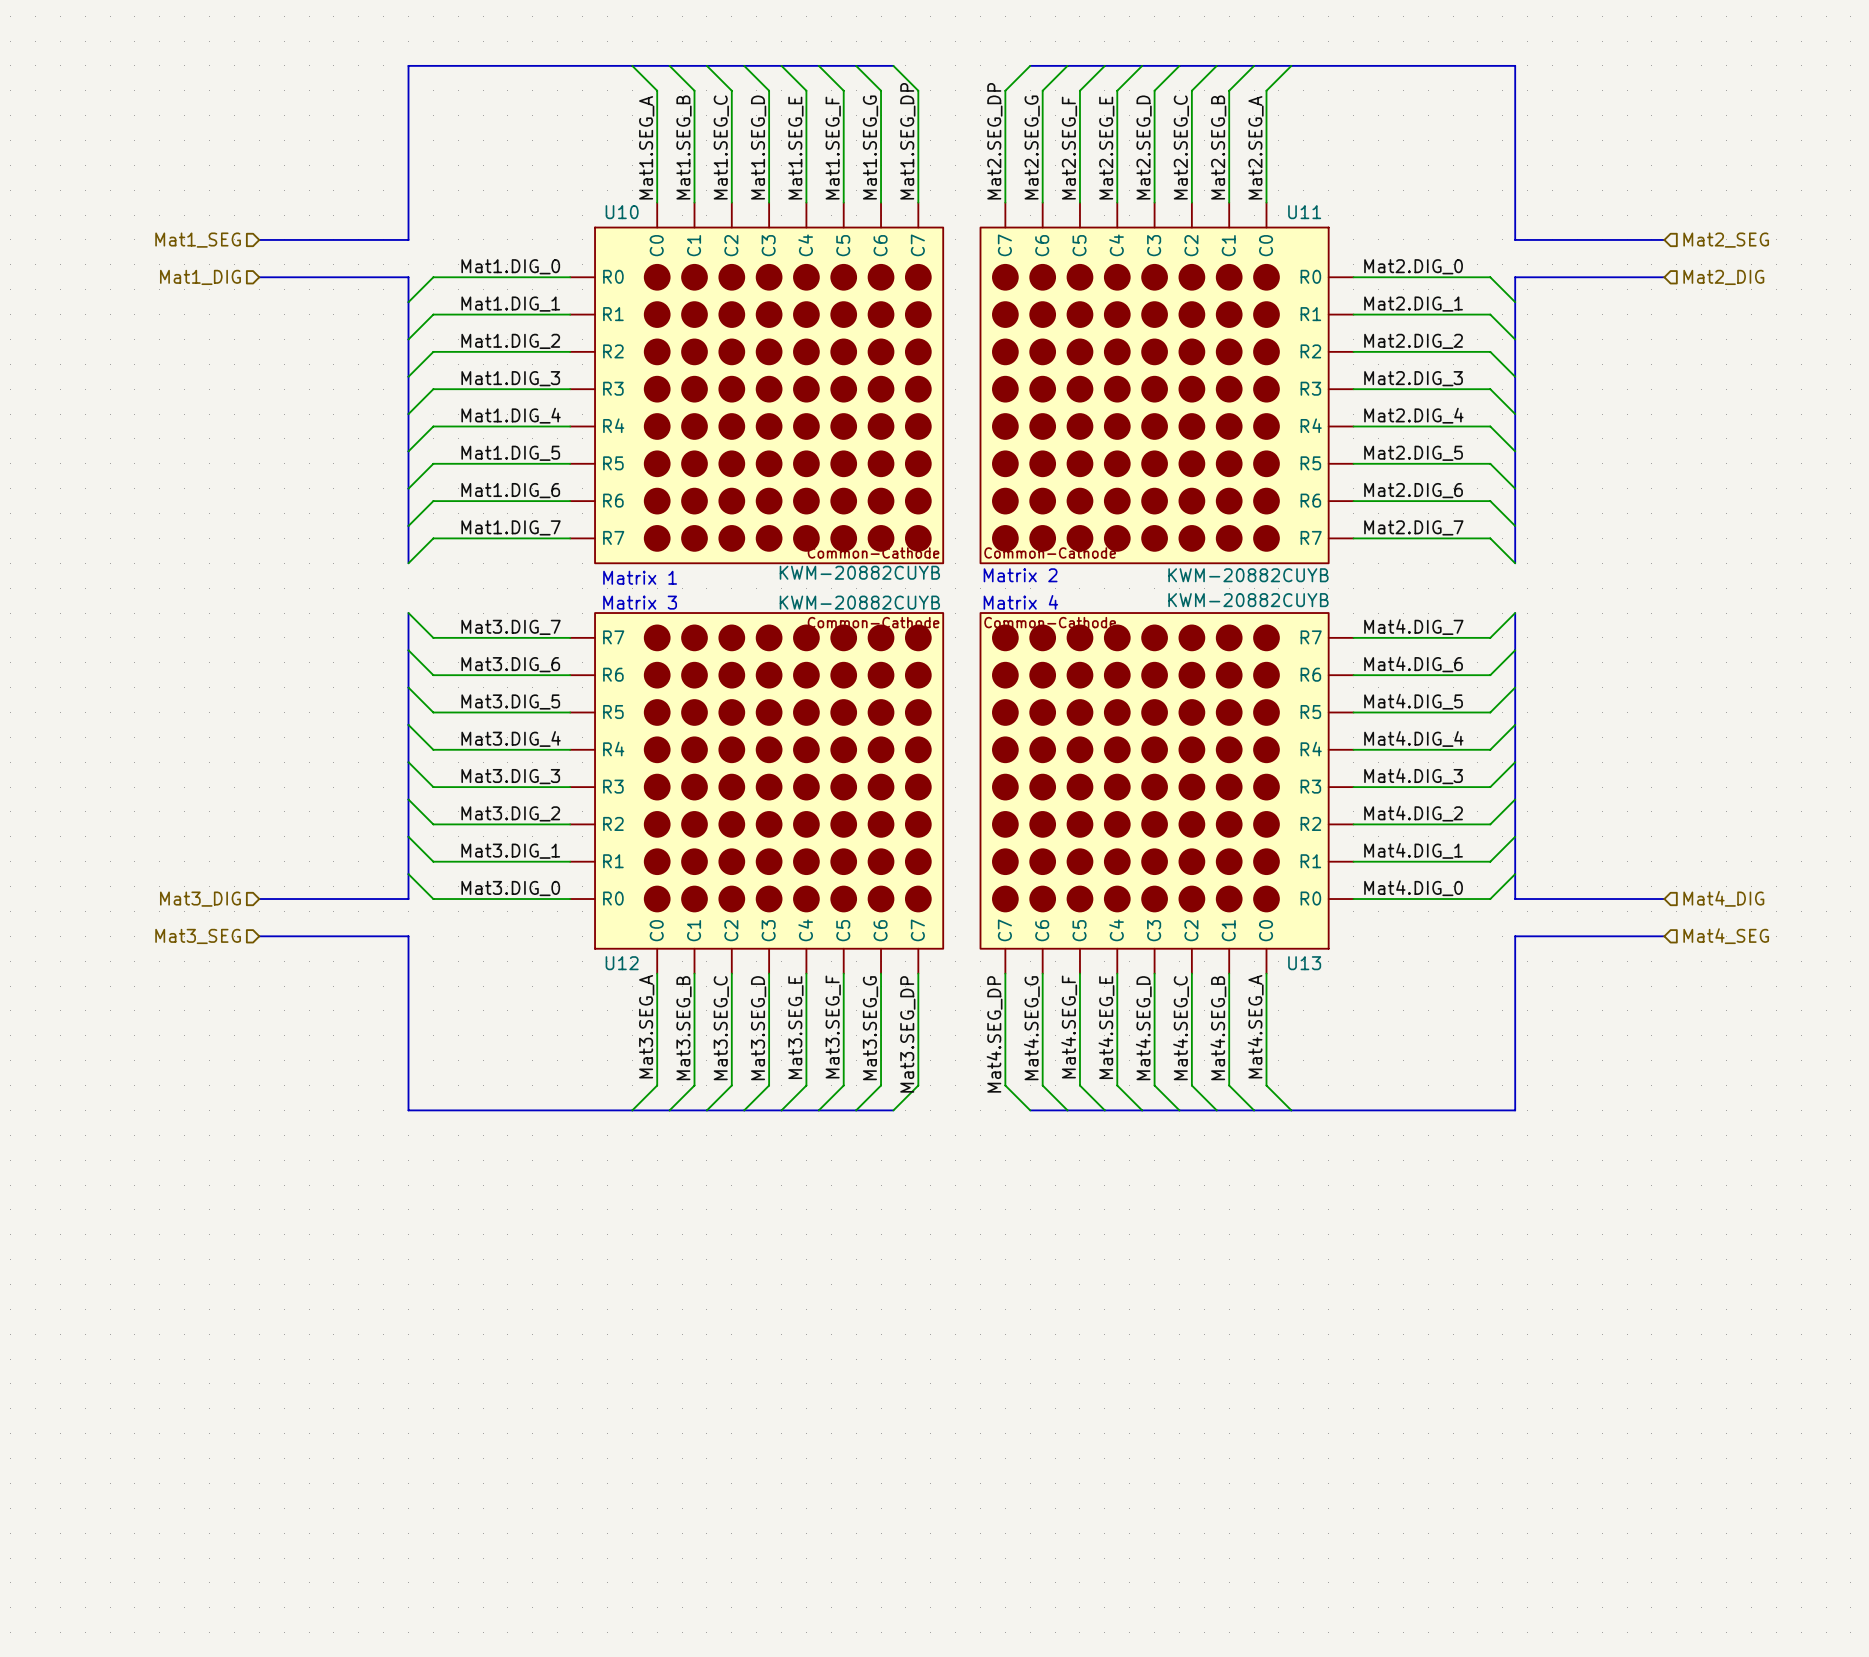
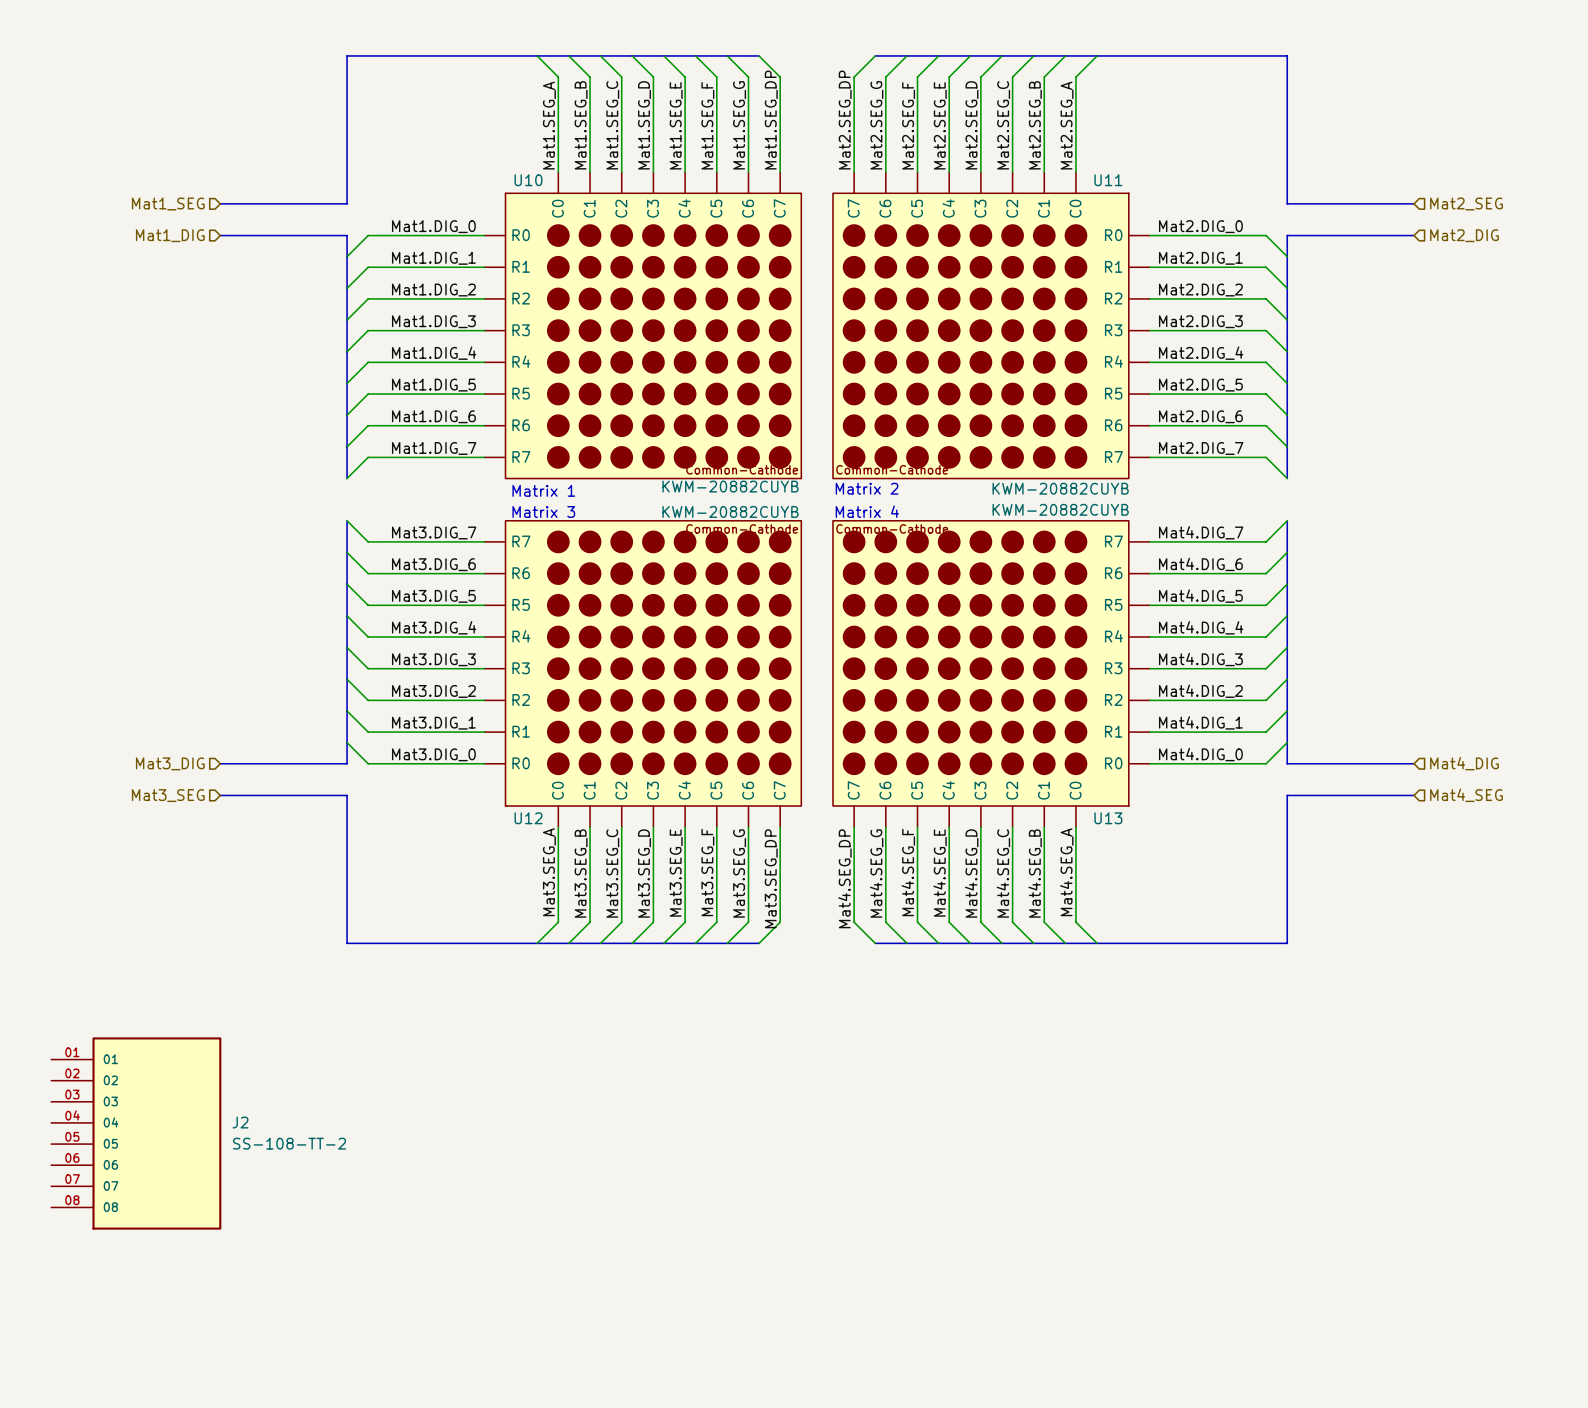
J2: none -> SS-108-TT-2 (136, 1133)

